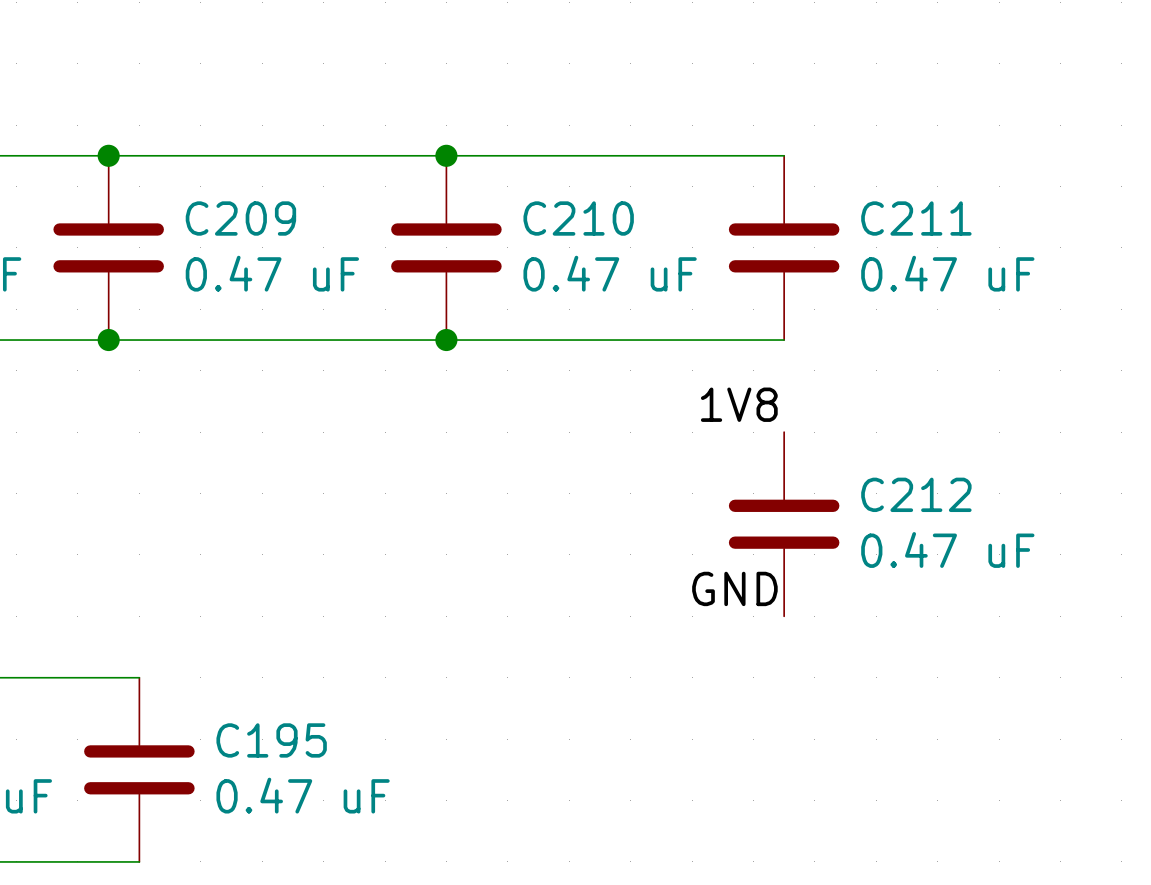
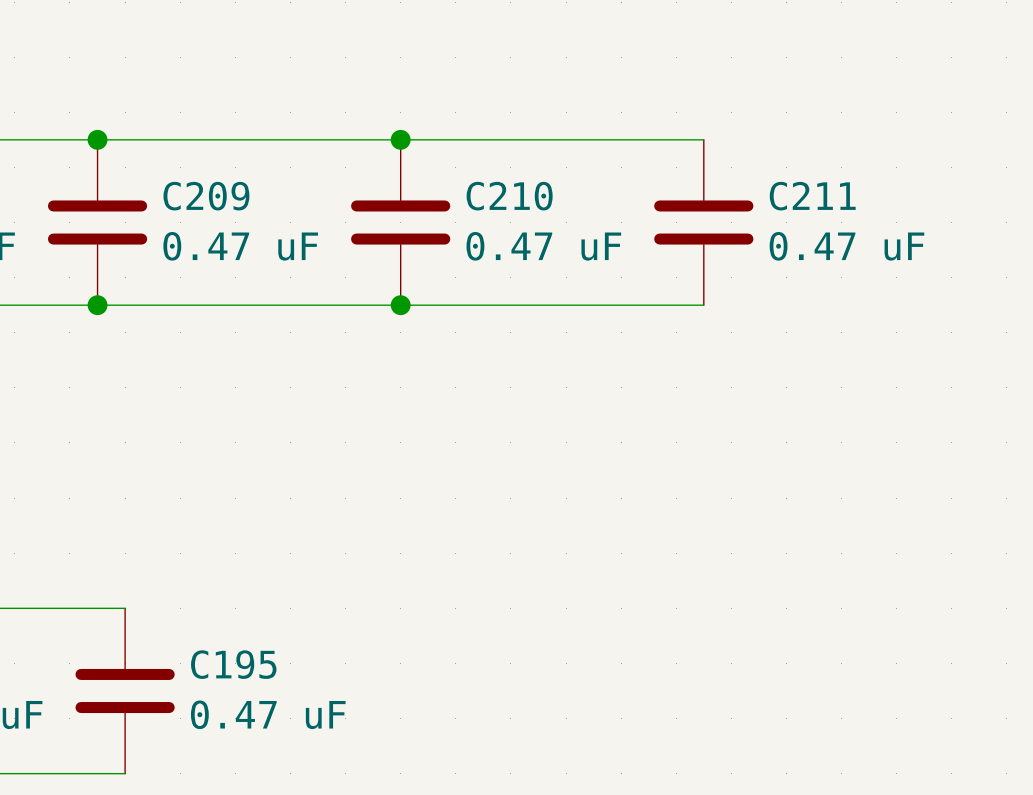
label: 1V8 (739, 404) -> none
C212: 0.47 uF (784, 524) -> none
label: GND (734, 588) -> none

